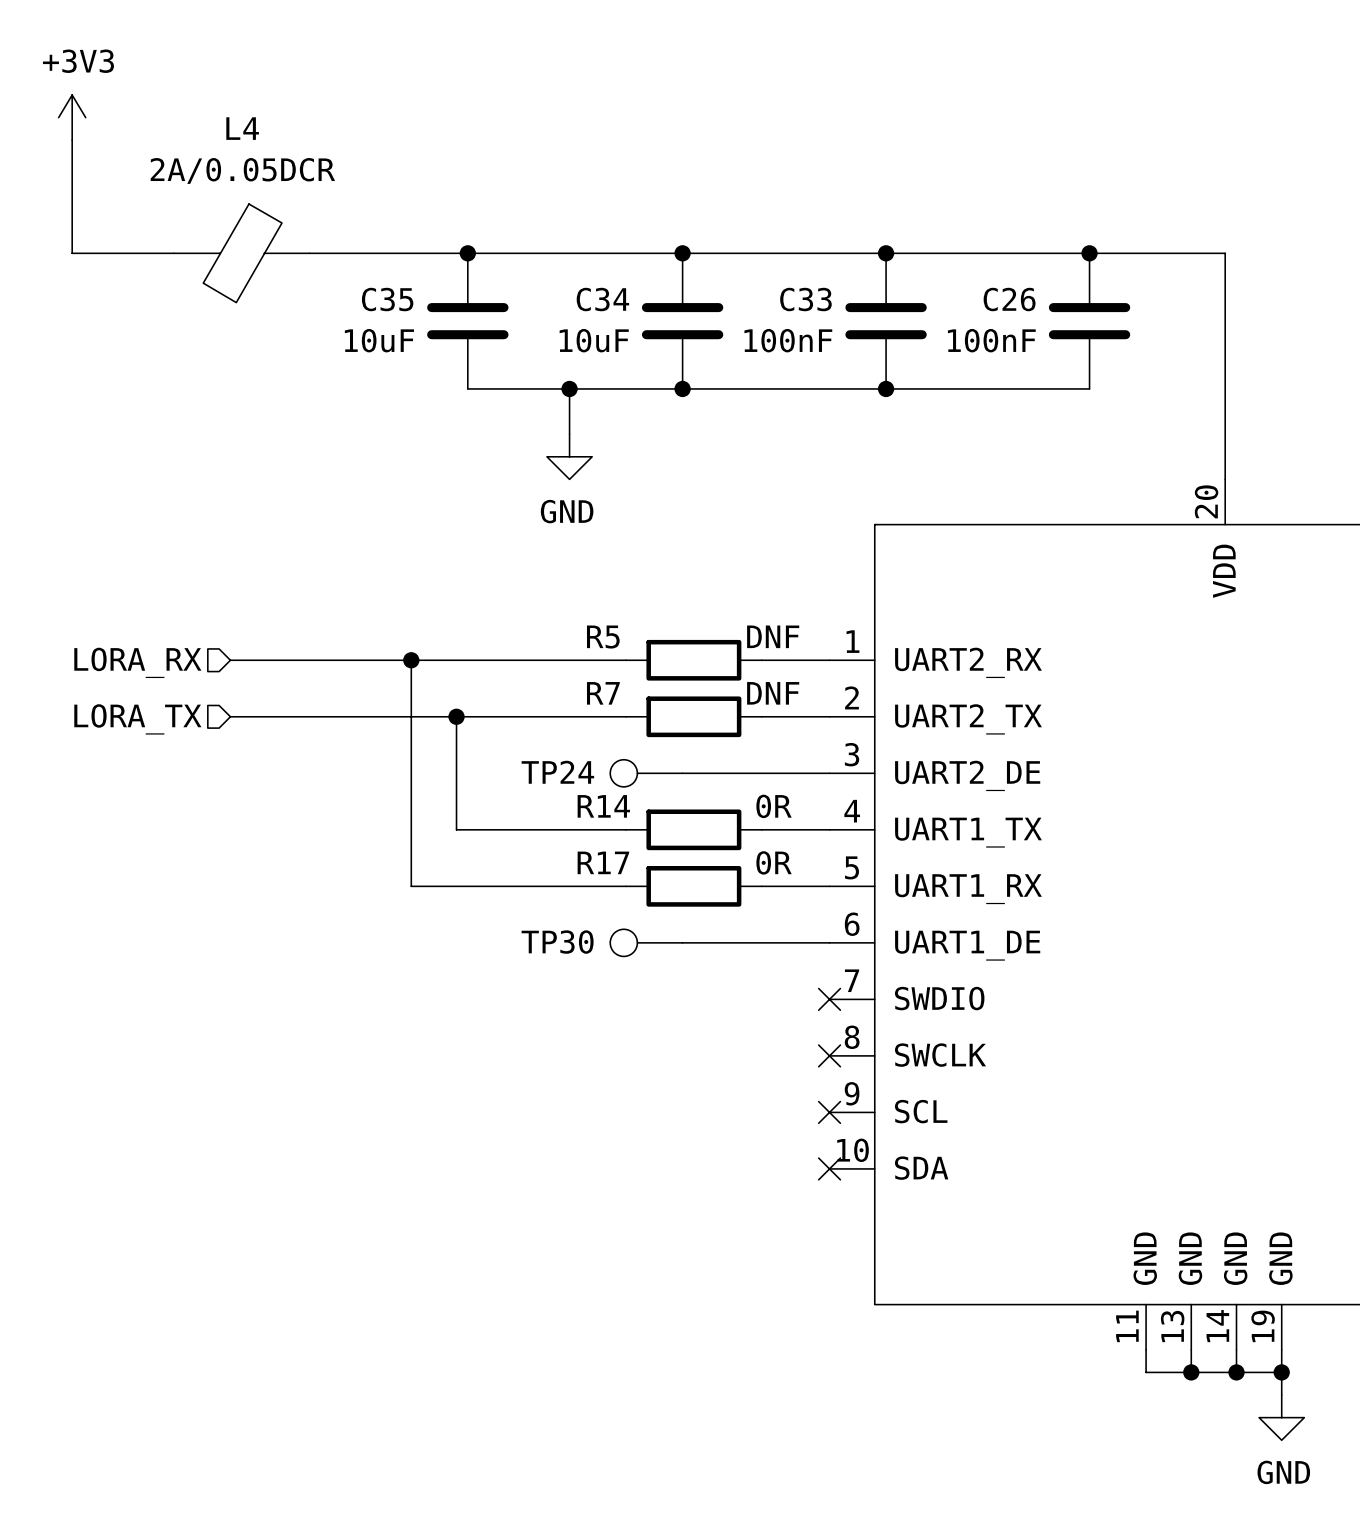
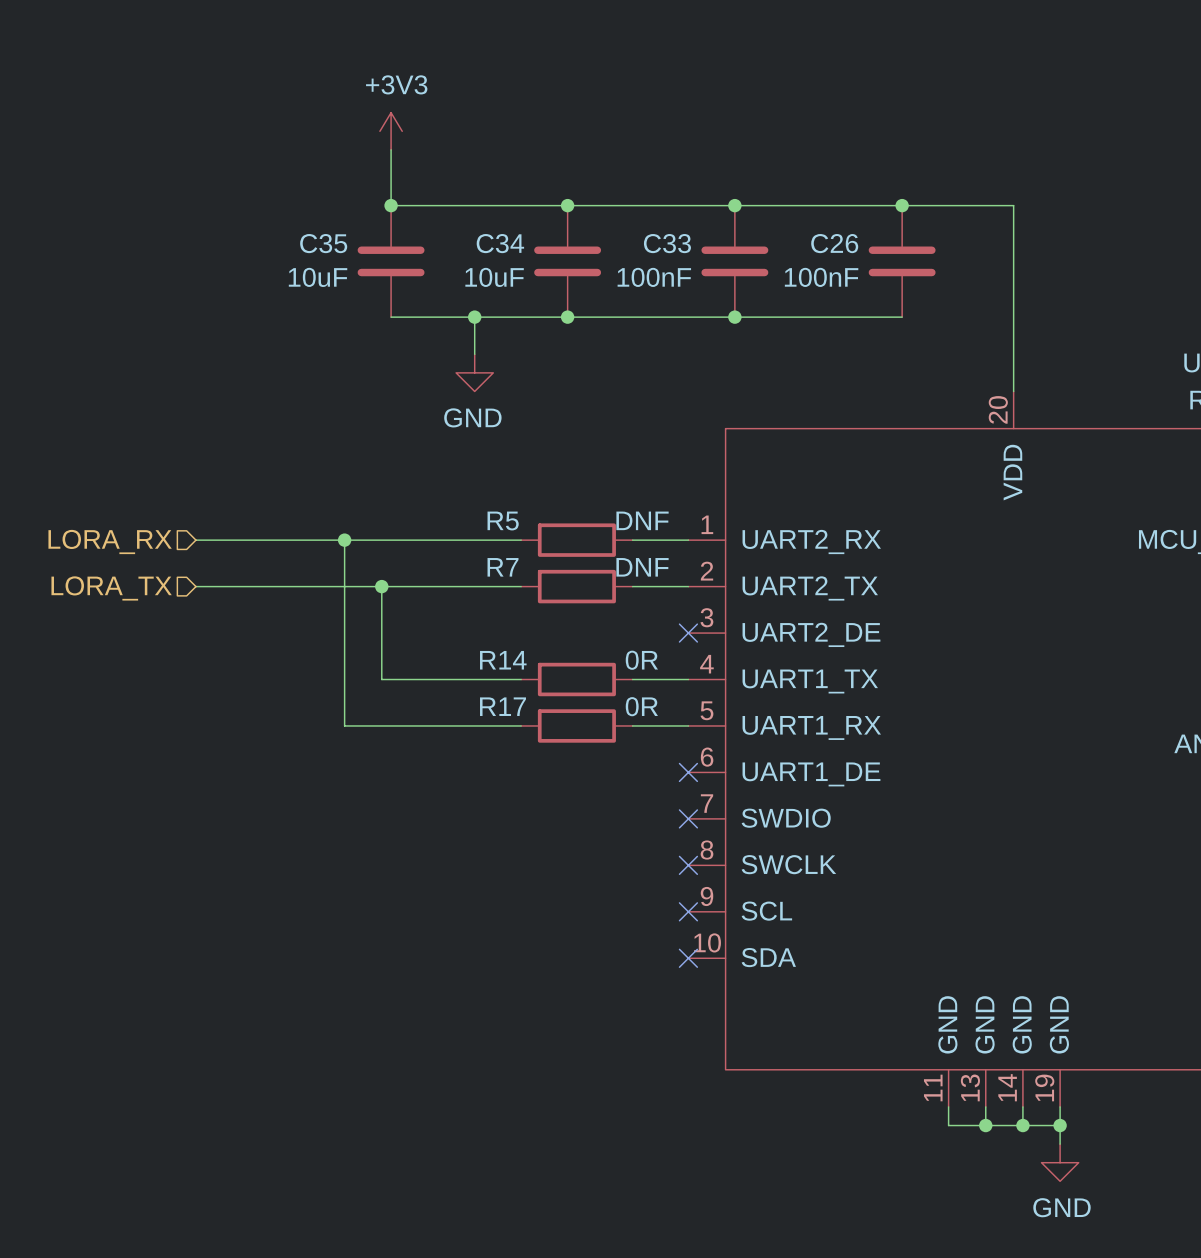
power symbol position: +3V3 (72, 117) -> +3V3 (391, 131)
wire: (72, 140) (72, 253) (173, 253) -> none
L4: 2A/0.05DCR (241, 253) -> none
wire: (309, 253) (467, 253) -> (391, 149) (391, 205)
TP24: (646, 773) -> none
wire: (682, 773) (829, 773) -> none
no-connect mark: none -> (688, 633)
TP30: (646, 942) -> none
wire: (682, 942) (829, 942) -> none
no-connect mark: none -> (688, 772)

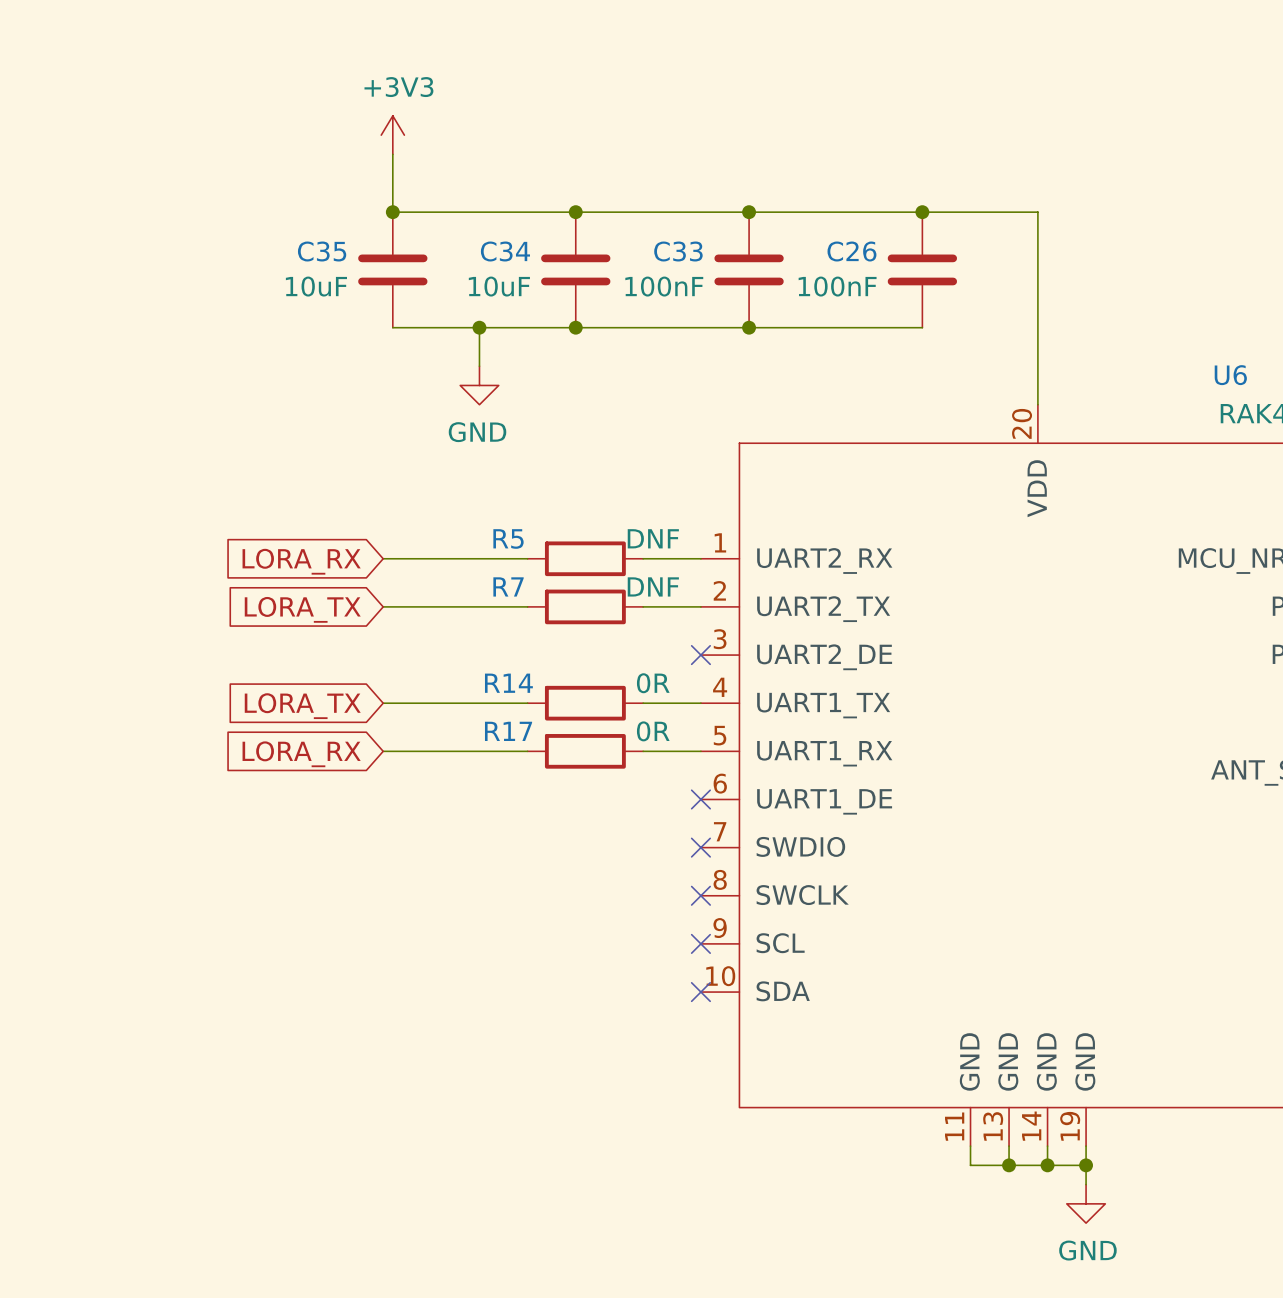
wire: (195, 540) (381, 540) -> none
wire: (344, 540) (344, 725) (381, 725) -> none
junction: (344, 540) -> none
hierarchical label: LORA_RX (110, 541) -> none
global label: none -> LORA_RX (301, 561)
wire: (195, 586) (381, 586) (381, 679) -> none
junction: (381, 586) -> none
hierarchical label: LORA_TX (111, 588) -> none
global label: none -> LORA_TX (302, 609)
global label: none -> LORA_TX (302, 706)
global label: none -> LORA_RX (301, 754)

